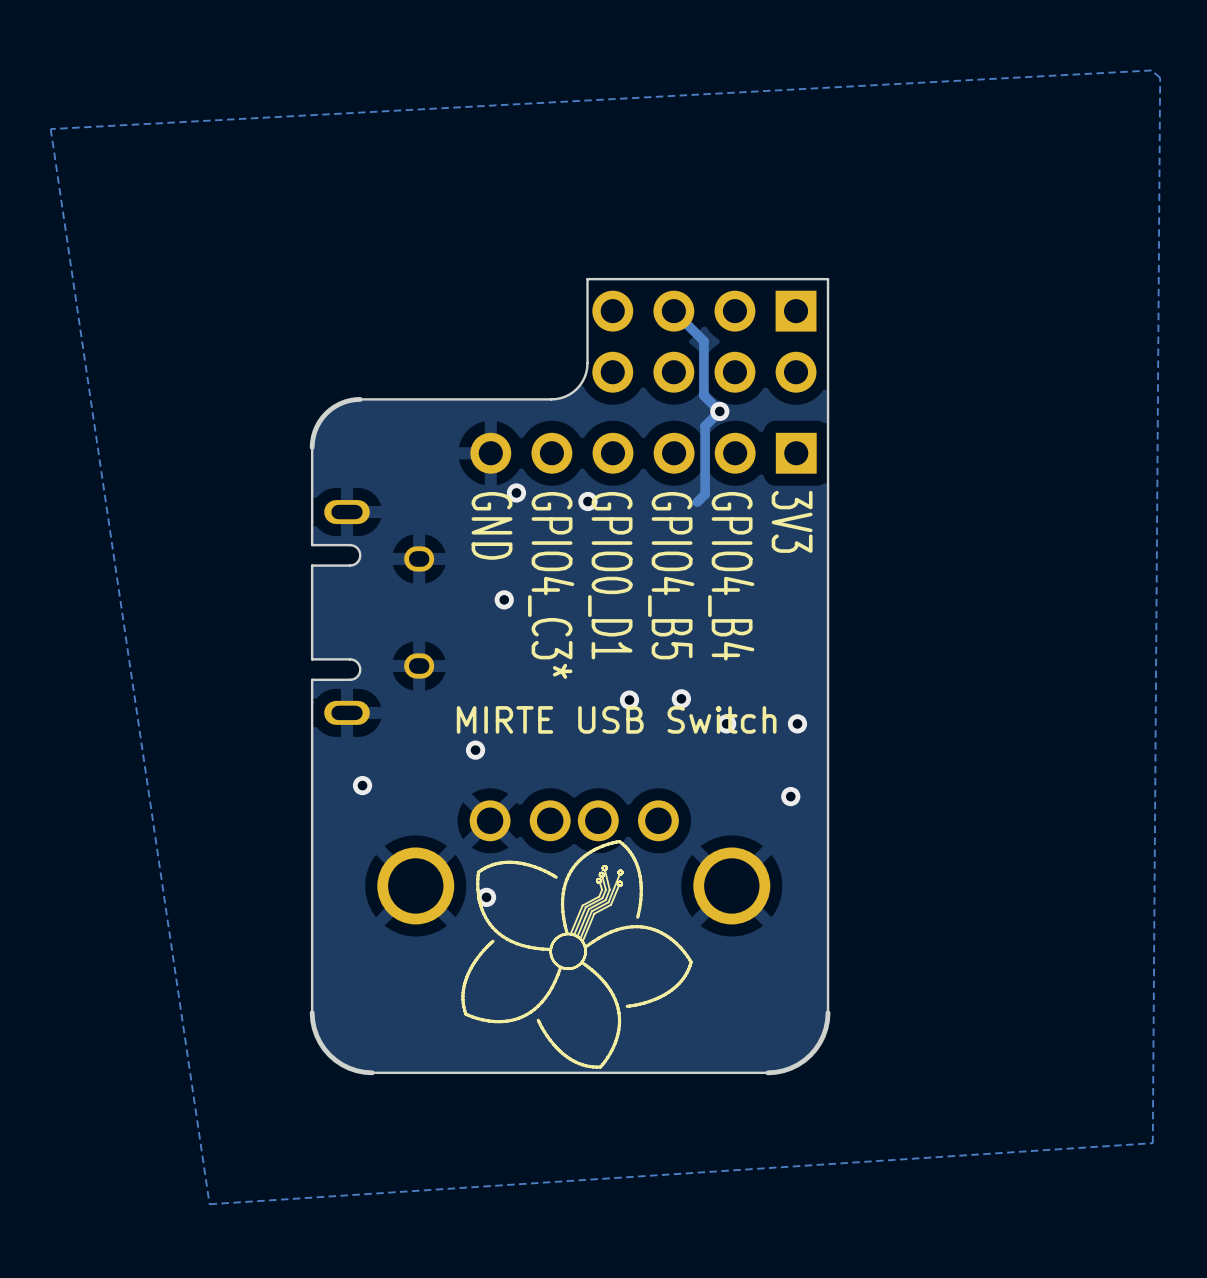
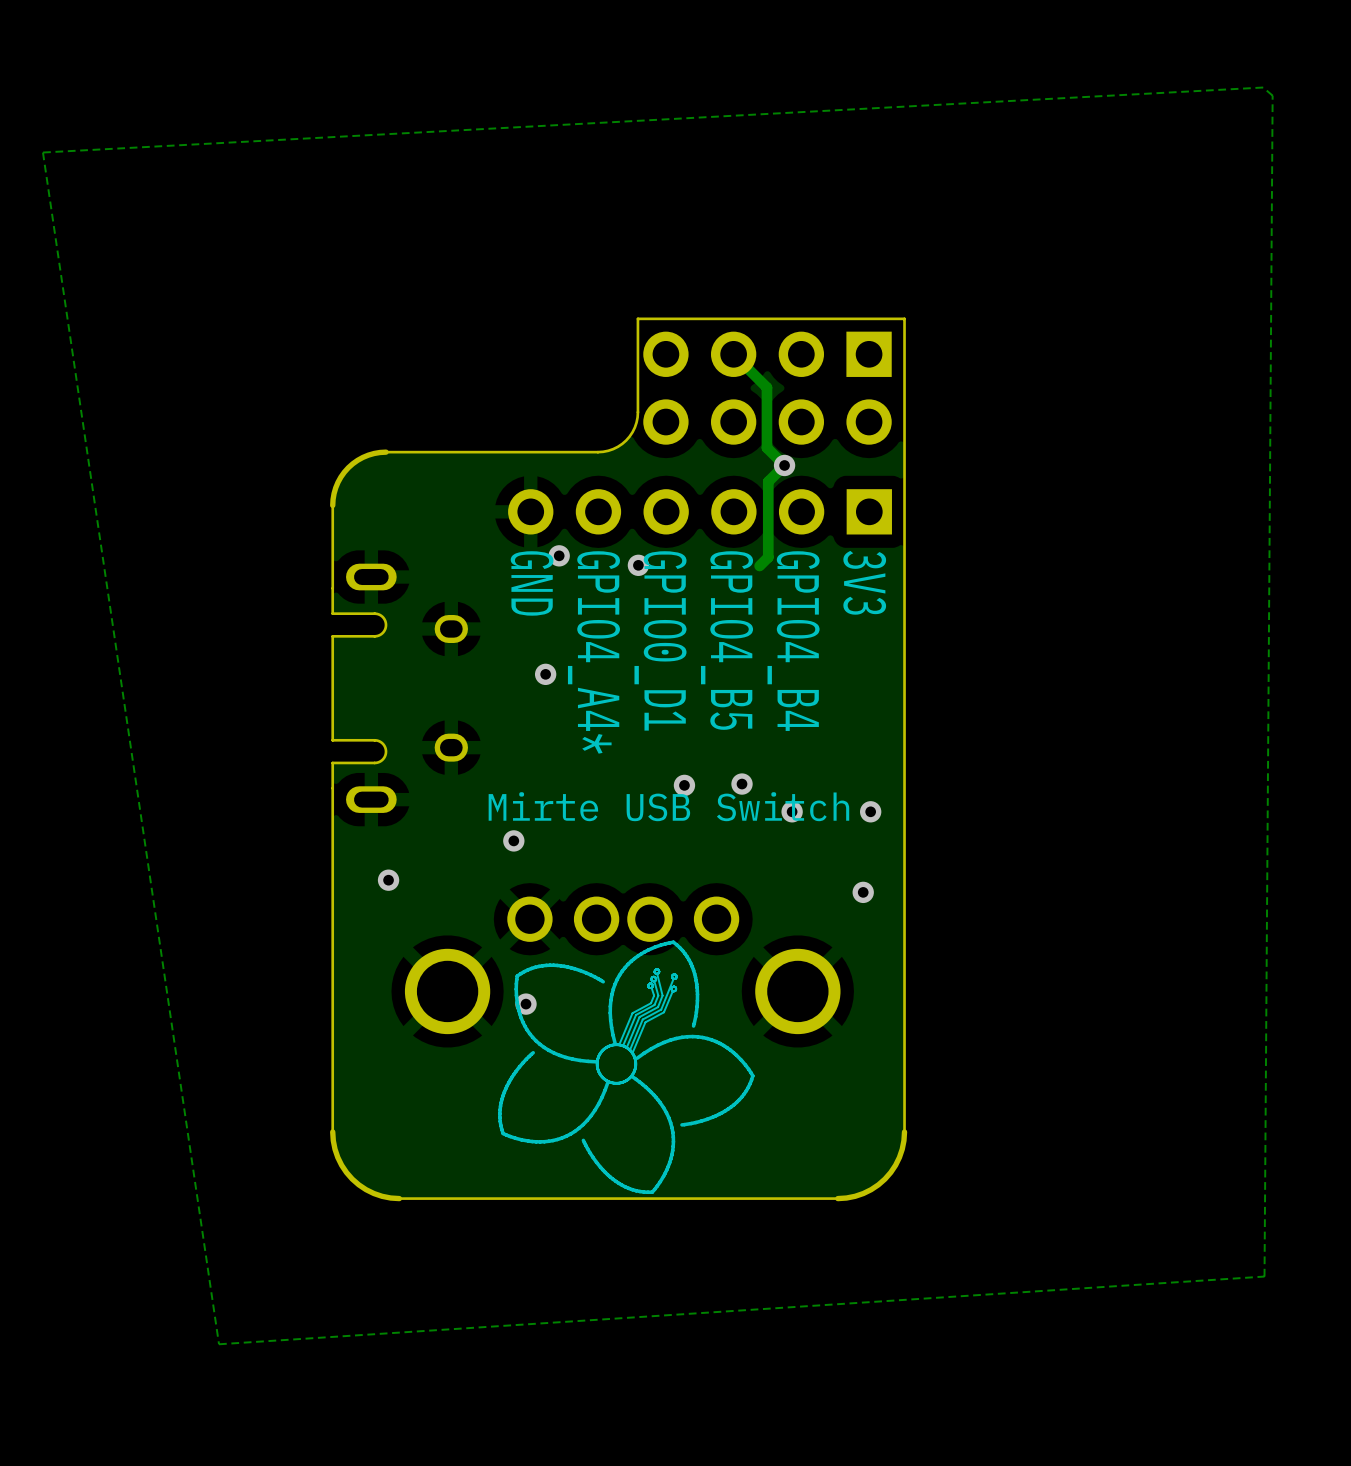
text: GPIO4_C3* (551, 585) -> GPIO4_A4* (593, 652)
text: MIRTE USB Switch (616, 719) -> Mirte USB Switch (668, 806)

